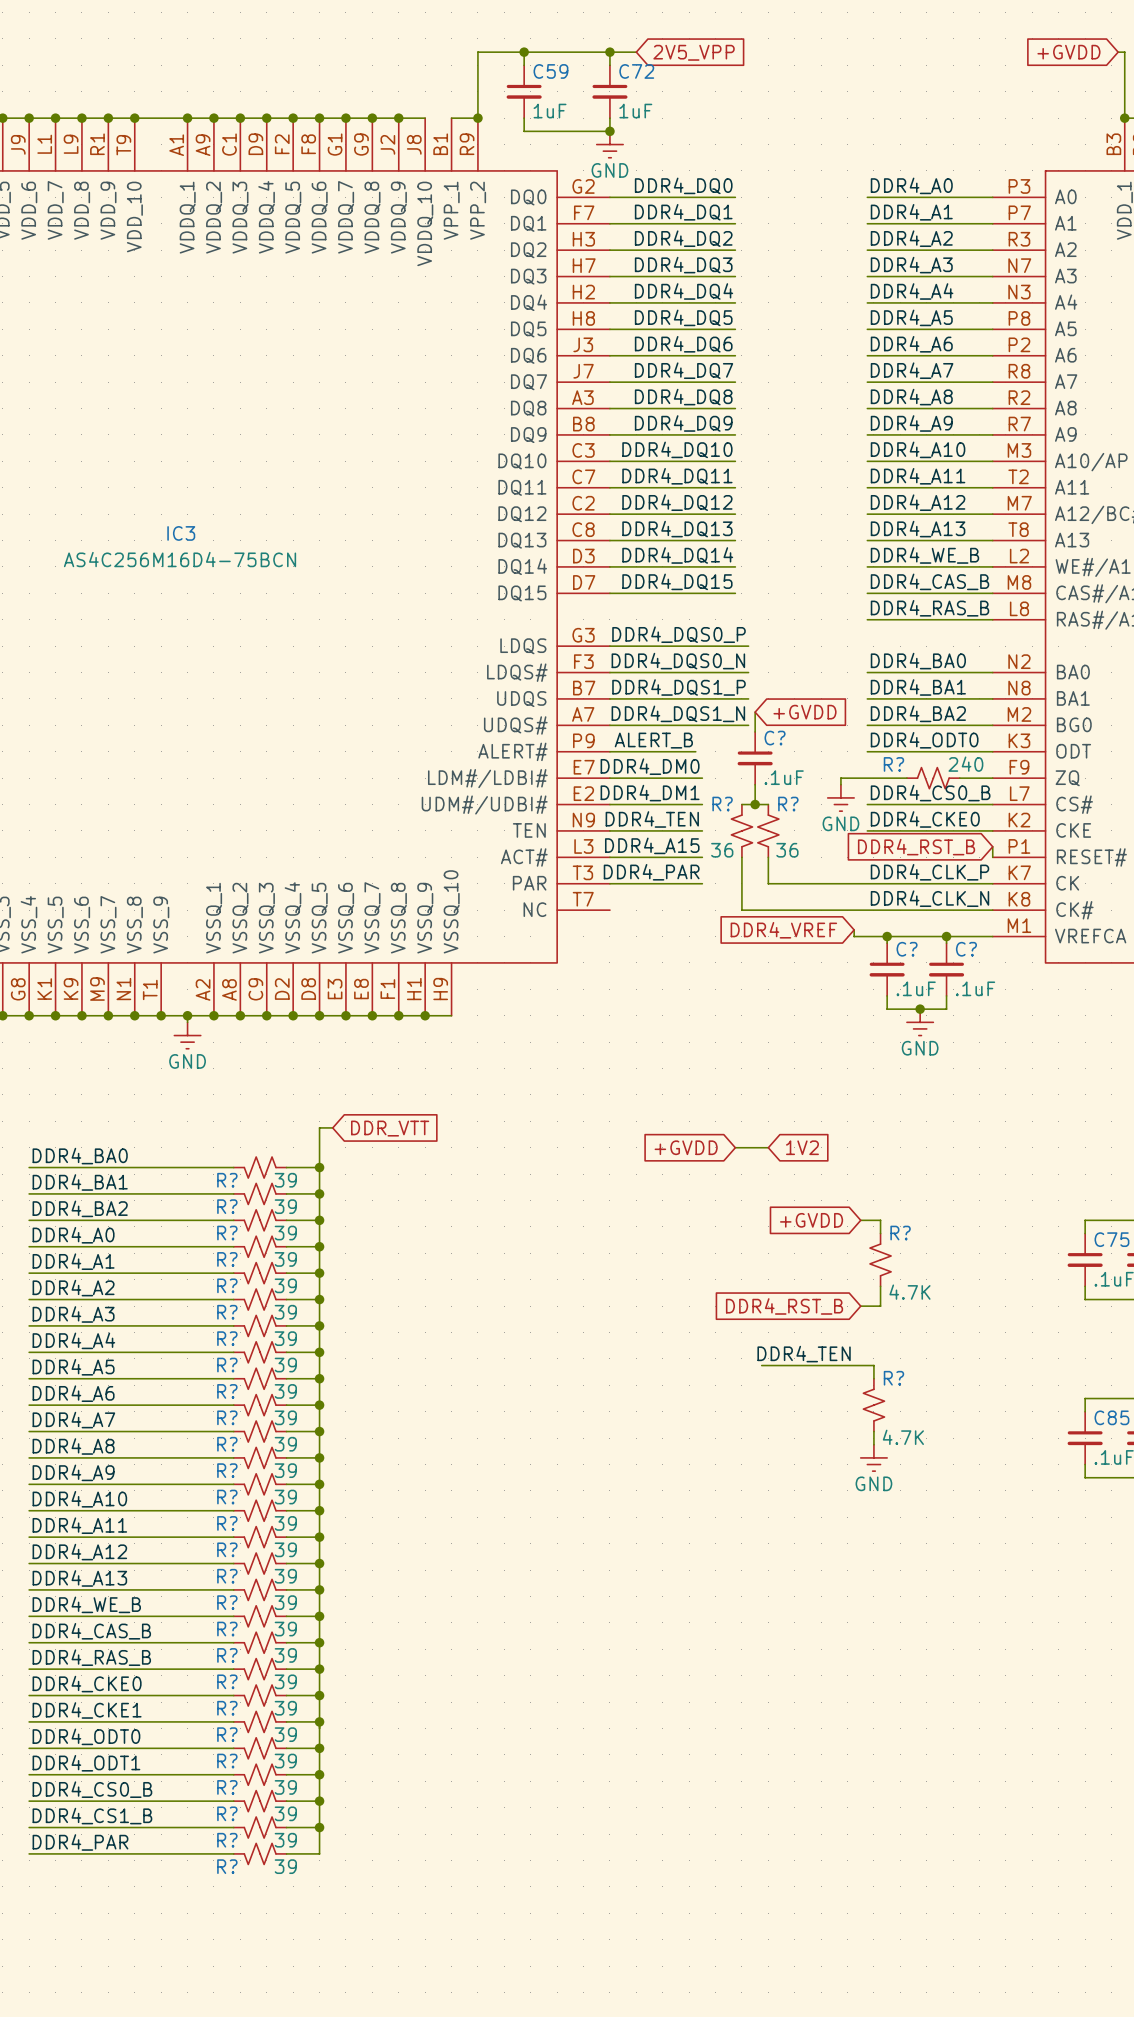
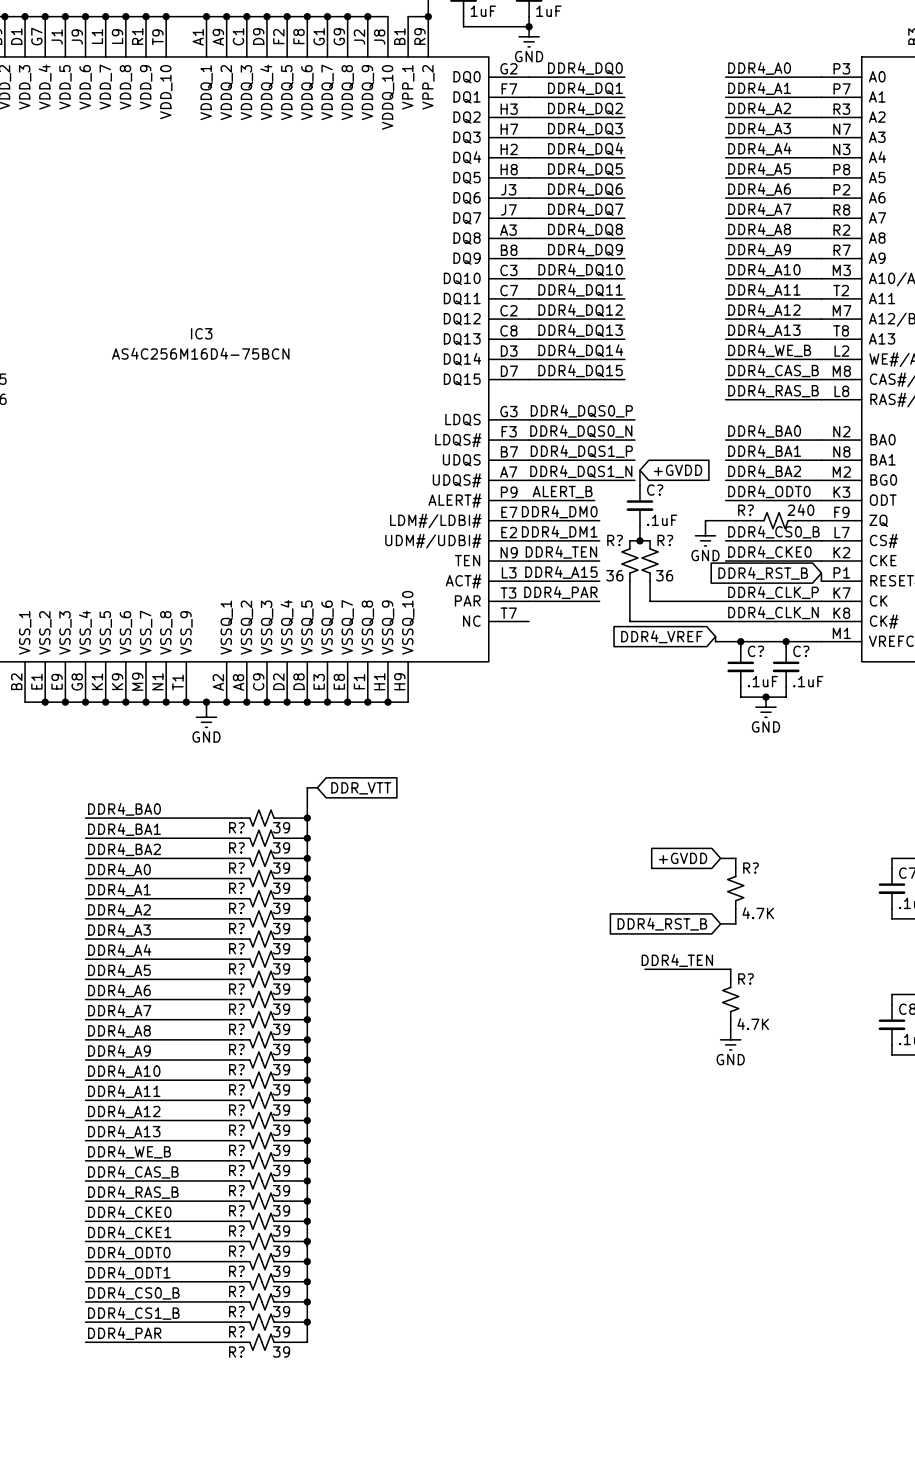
global label: +GVDD (686, 1147) -> none
wire: (735, 1147) (768, 1147) -> none
global label: 1V2 (802, 1147) -> none

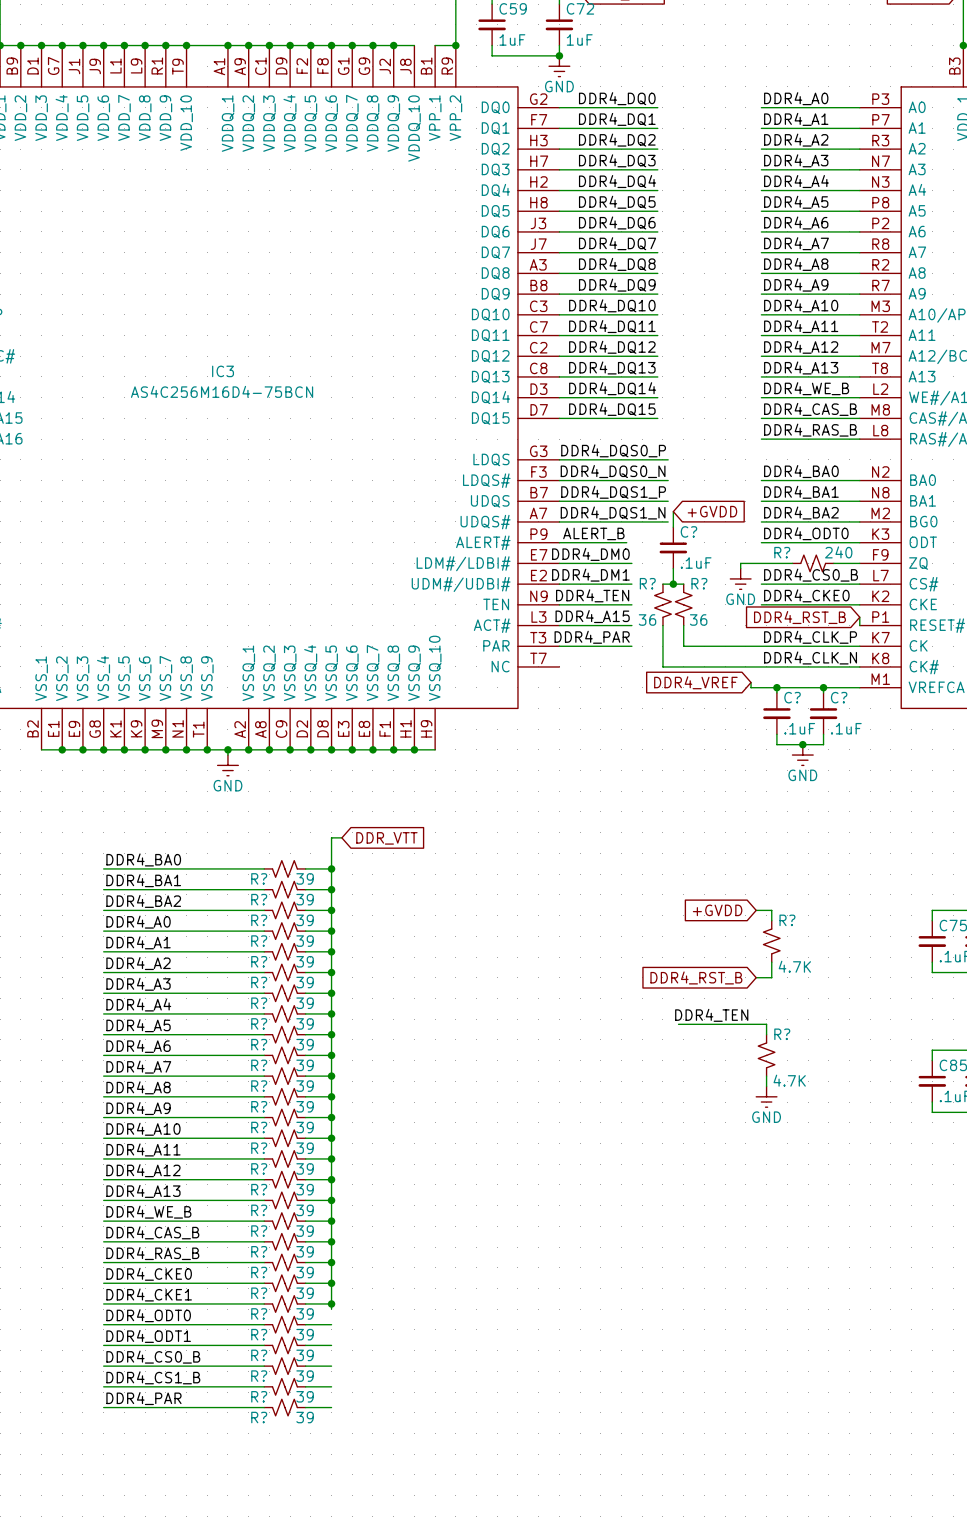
wire: (307, 1246) (307, 1342) -> none
junction: (307, 1261) -> none
junction: (307, 1281) -> none
junction: (307, 1301) -> none
junction: (307, 1322) -> none

